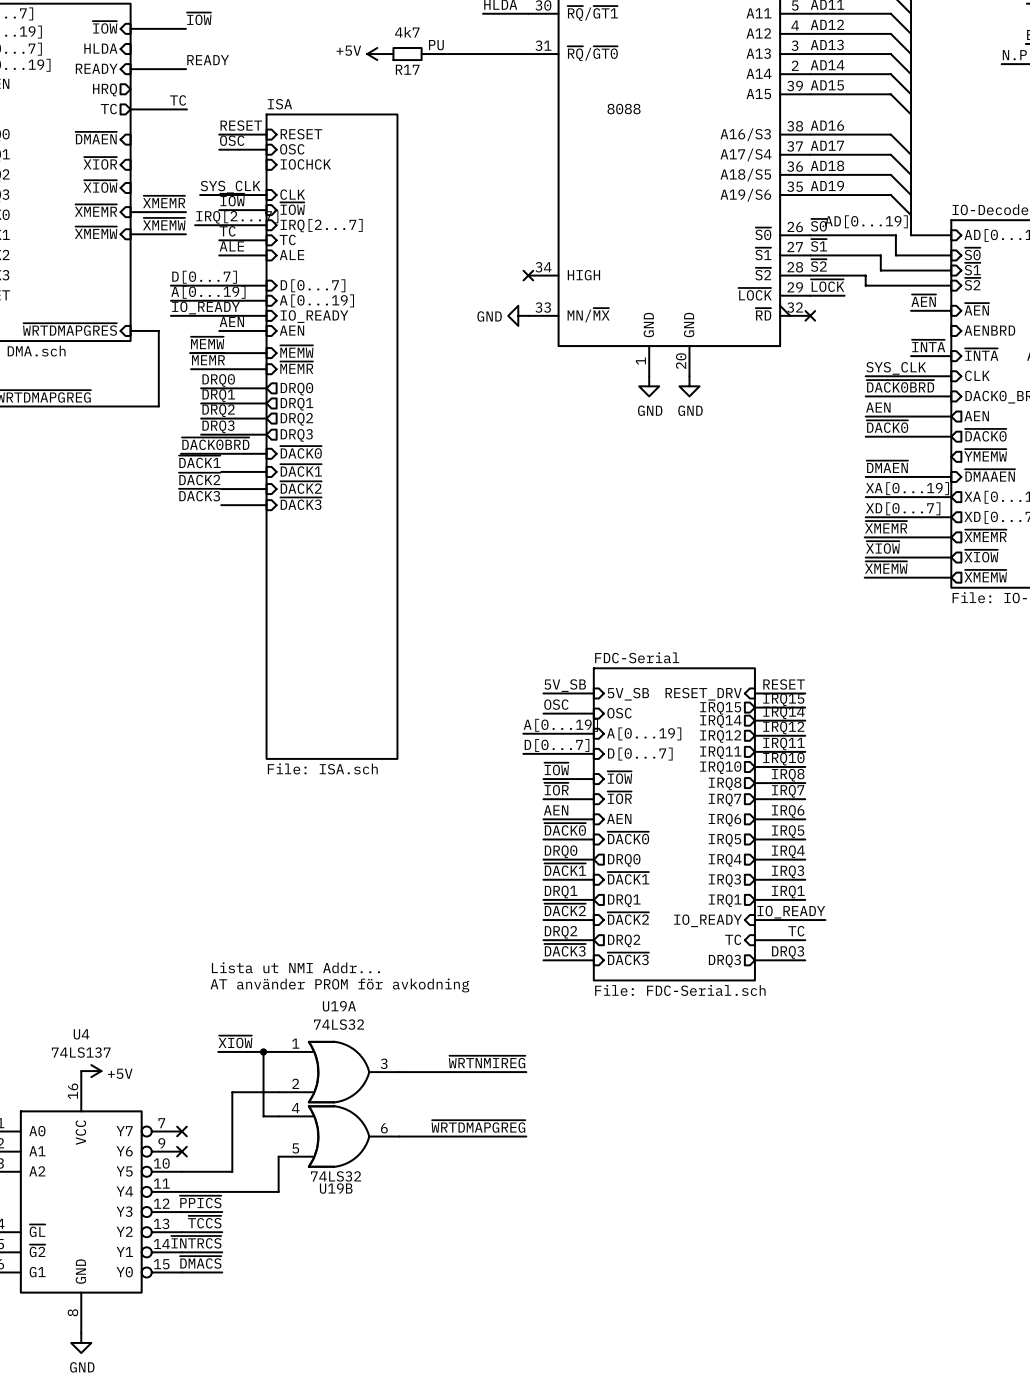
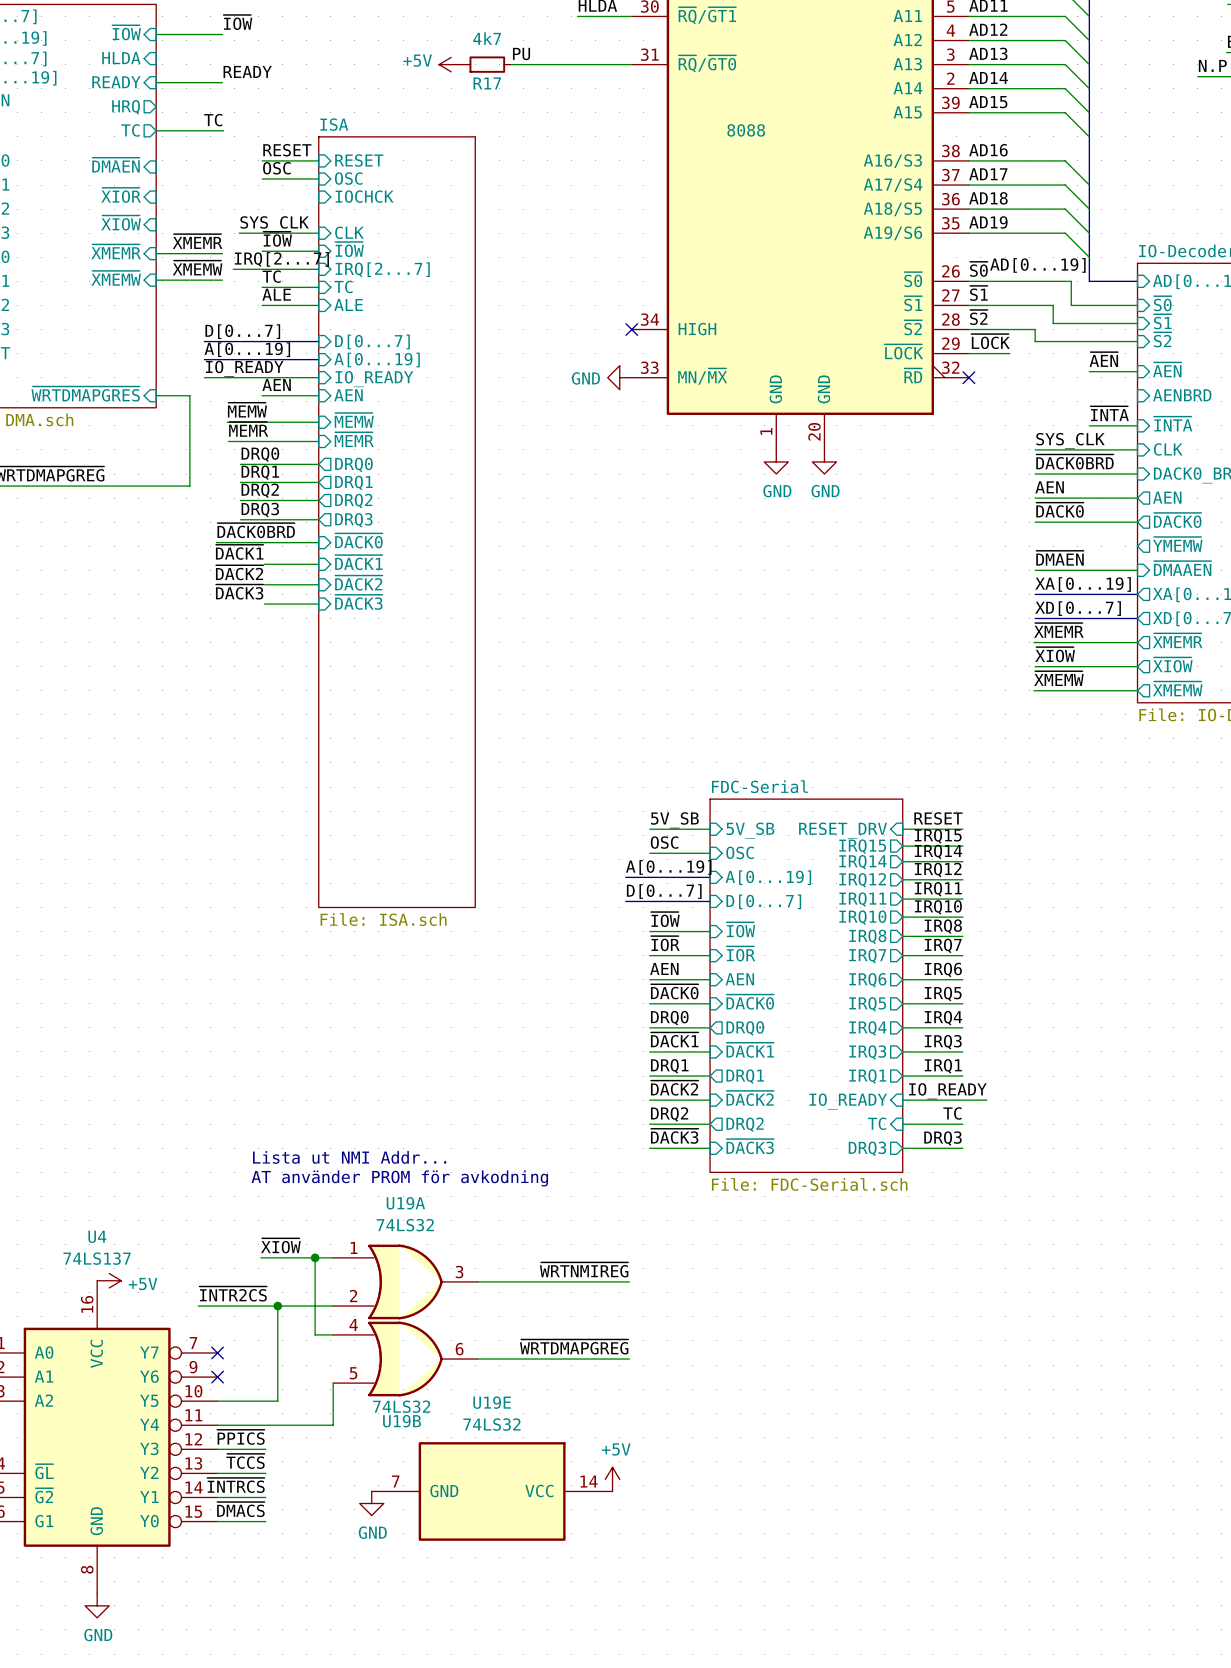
label: none -> ~{INTR2CS} (233, 1294)
wire: none -> (198, 1306) (277, 1306)
junction: none -> (277, 1306)
power symbol: none -> +5V (612, 1479)
U19E: none -> 74LS32 (492, 1491)
power symbol: none -> GND (371, 1503)

